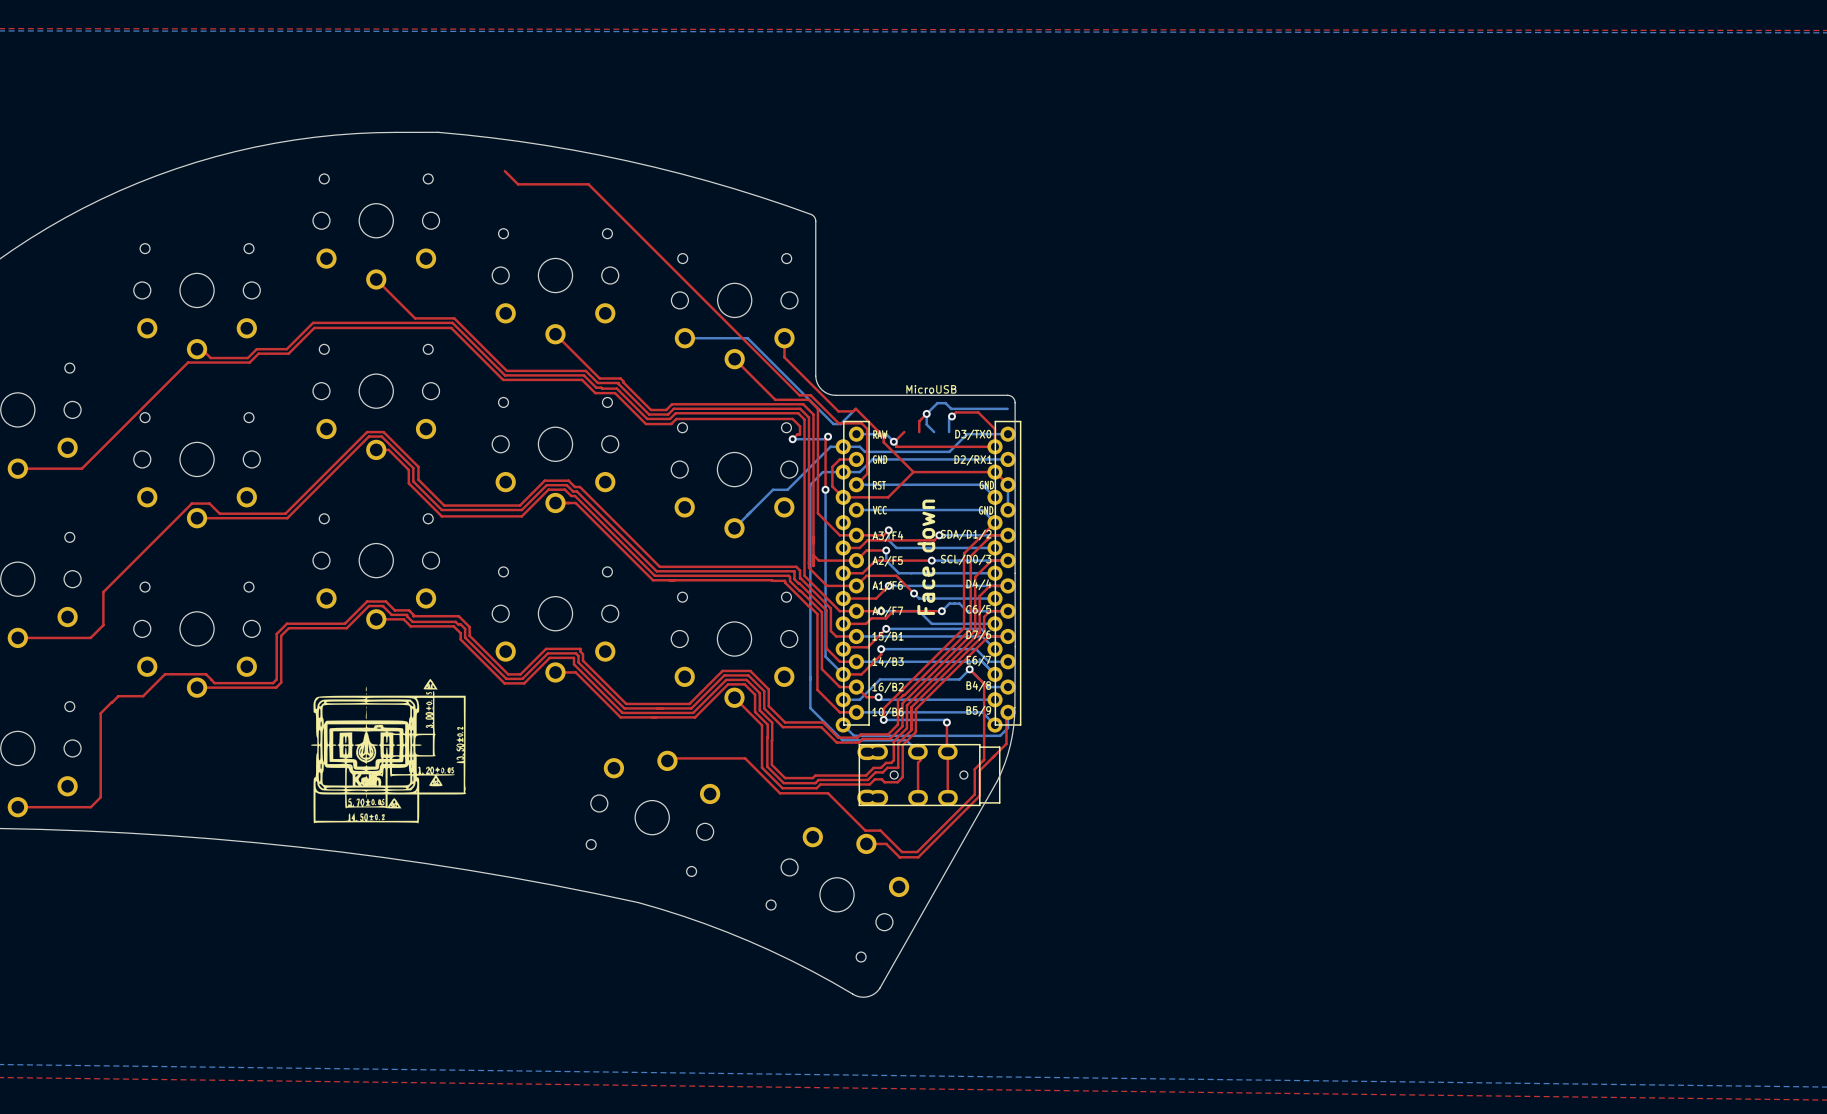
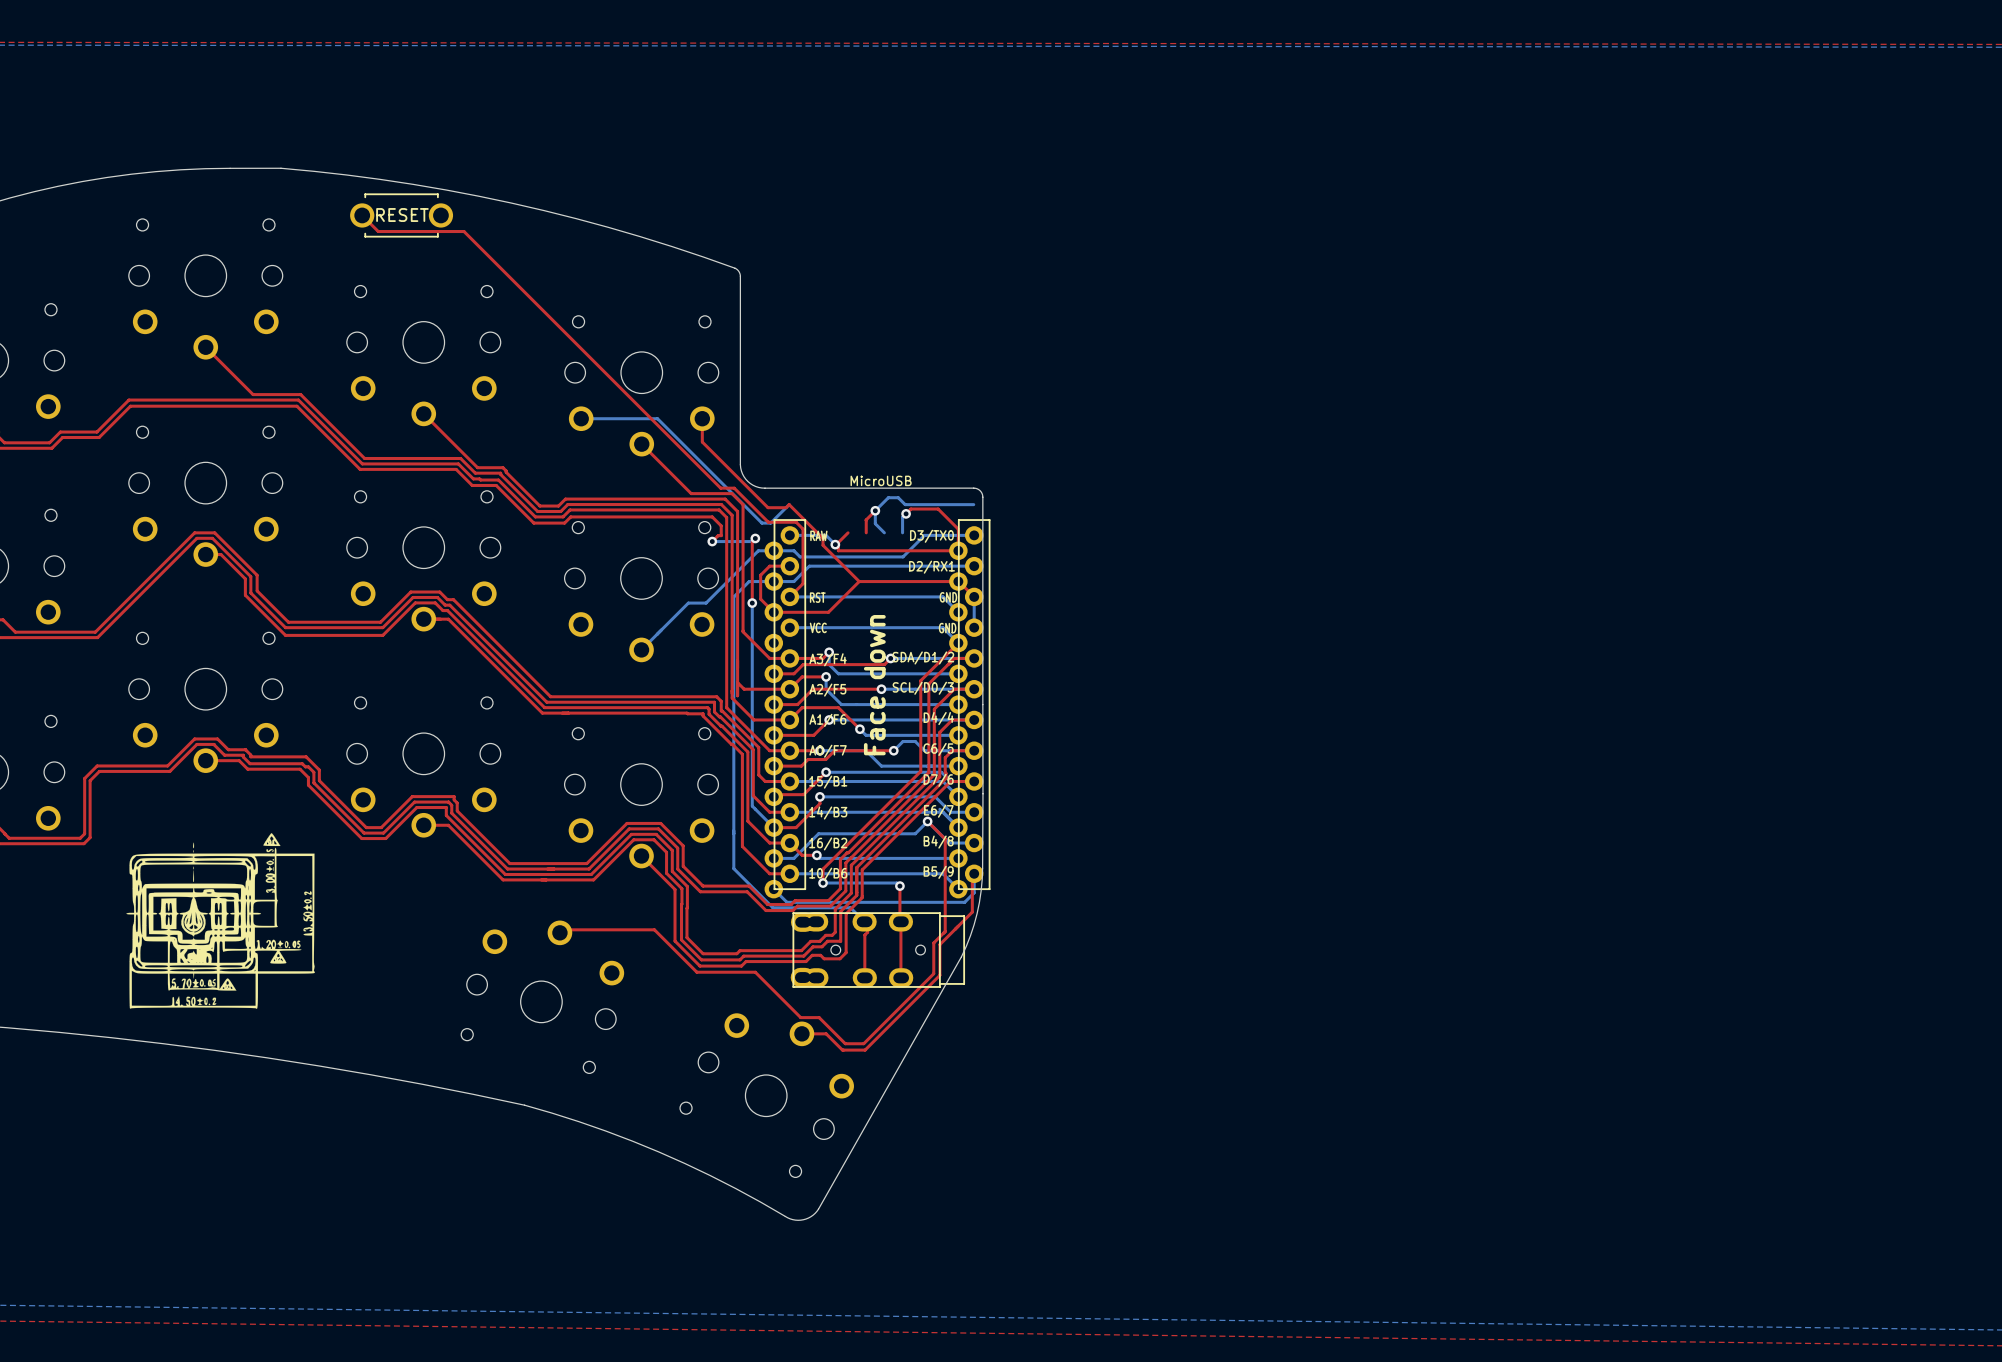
part: none -> (401, 215)
drawing: [872, 455, 888, 464] -> none

